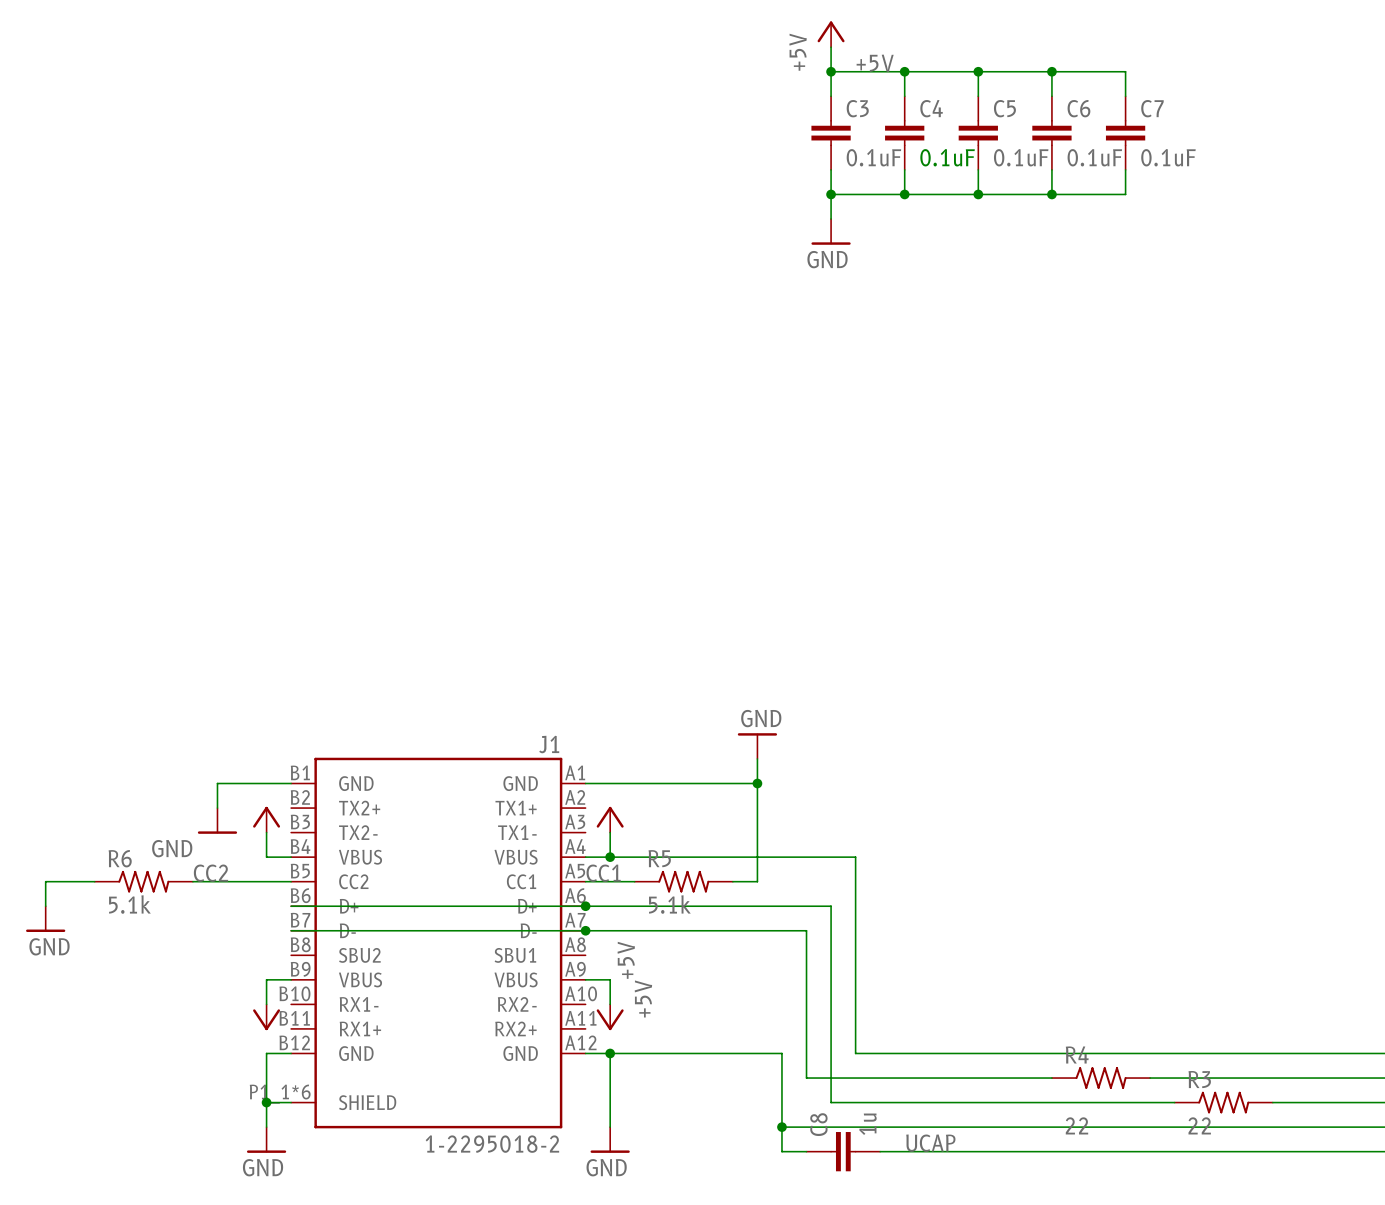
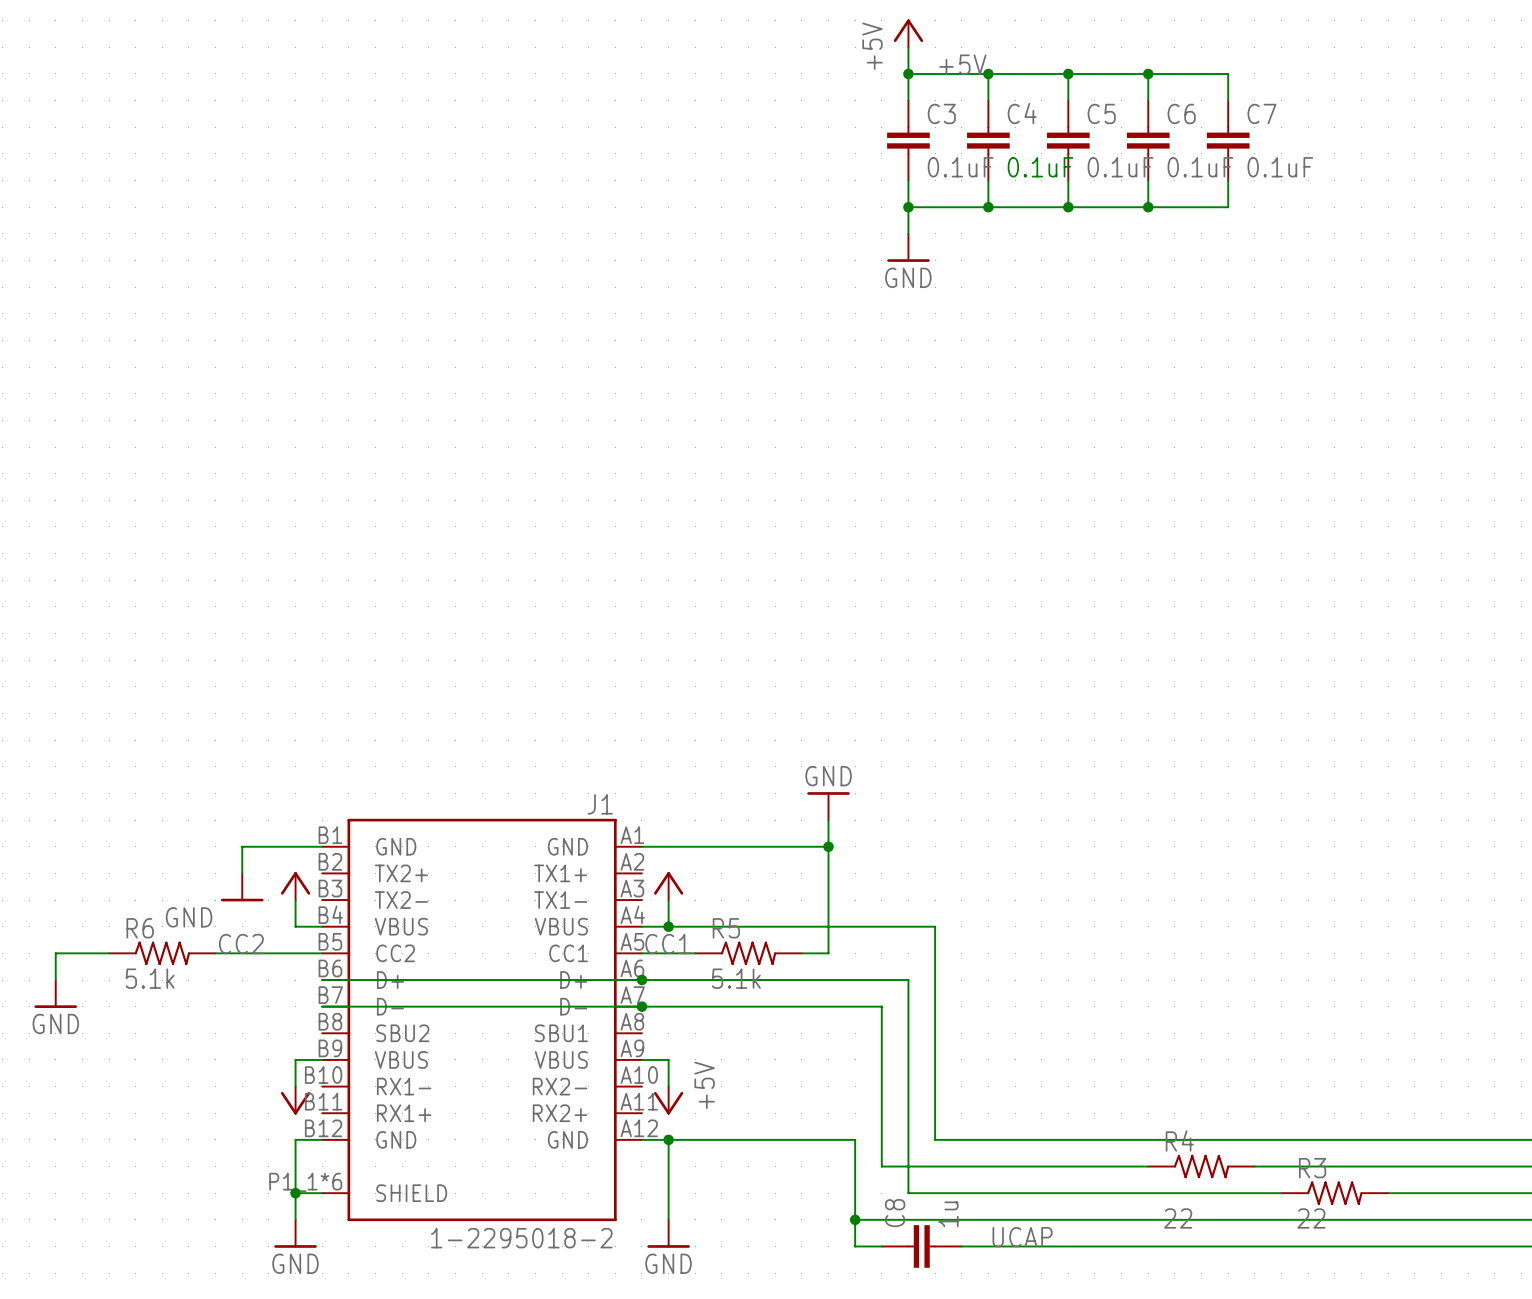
label: +5V (626, 960) -> none

